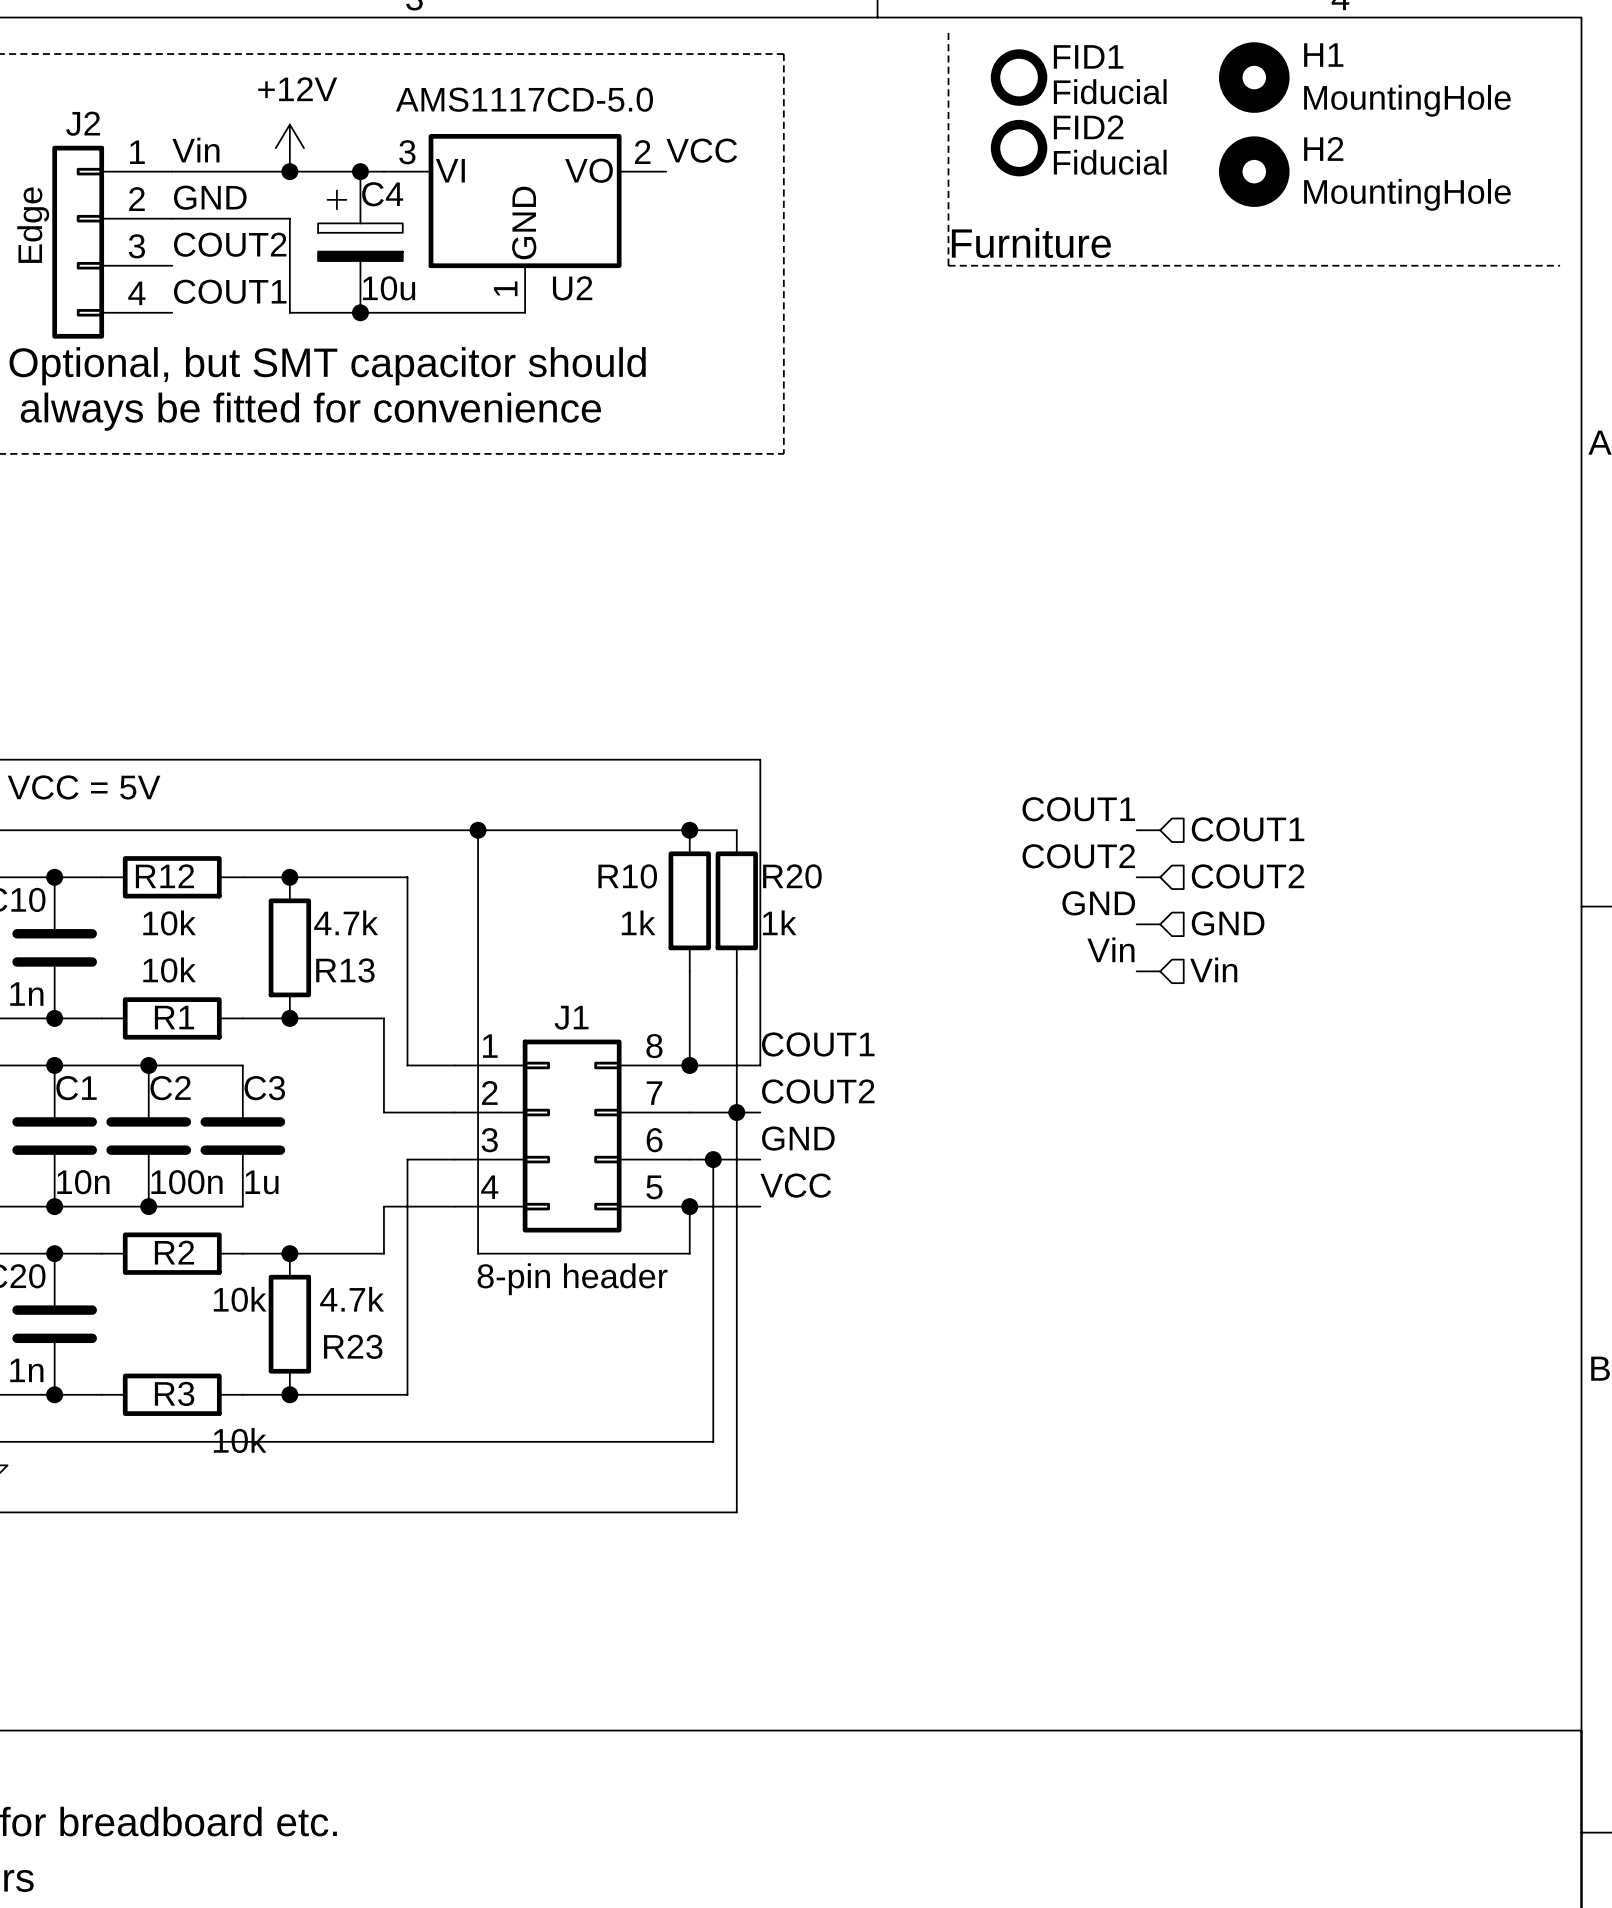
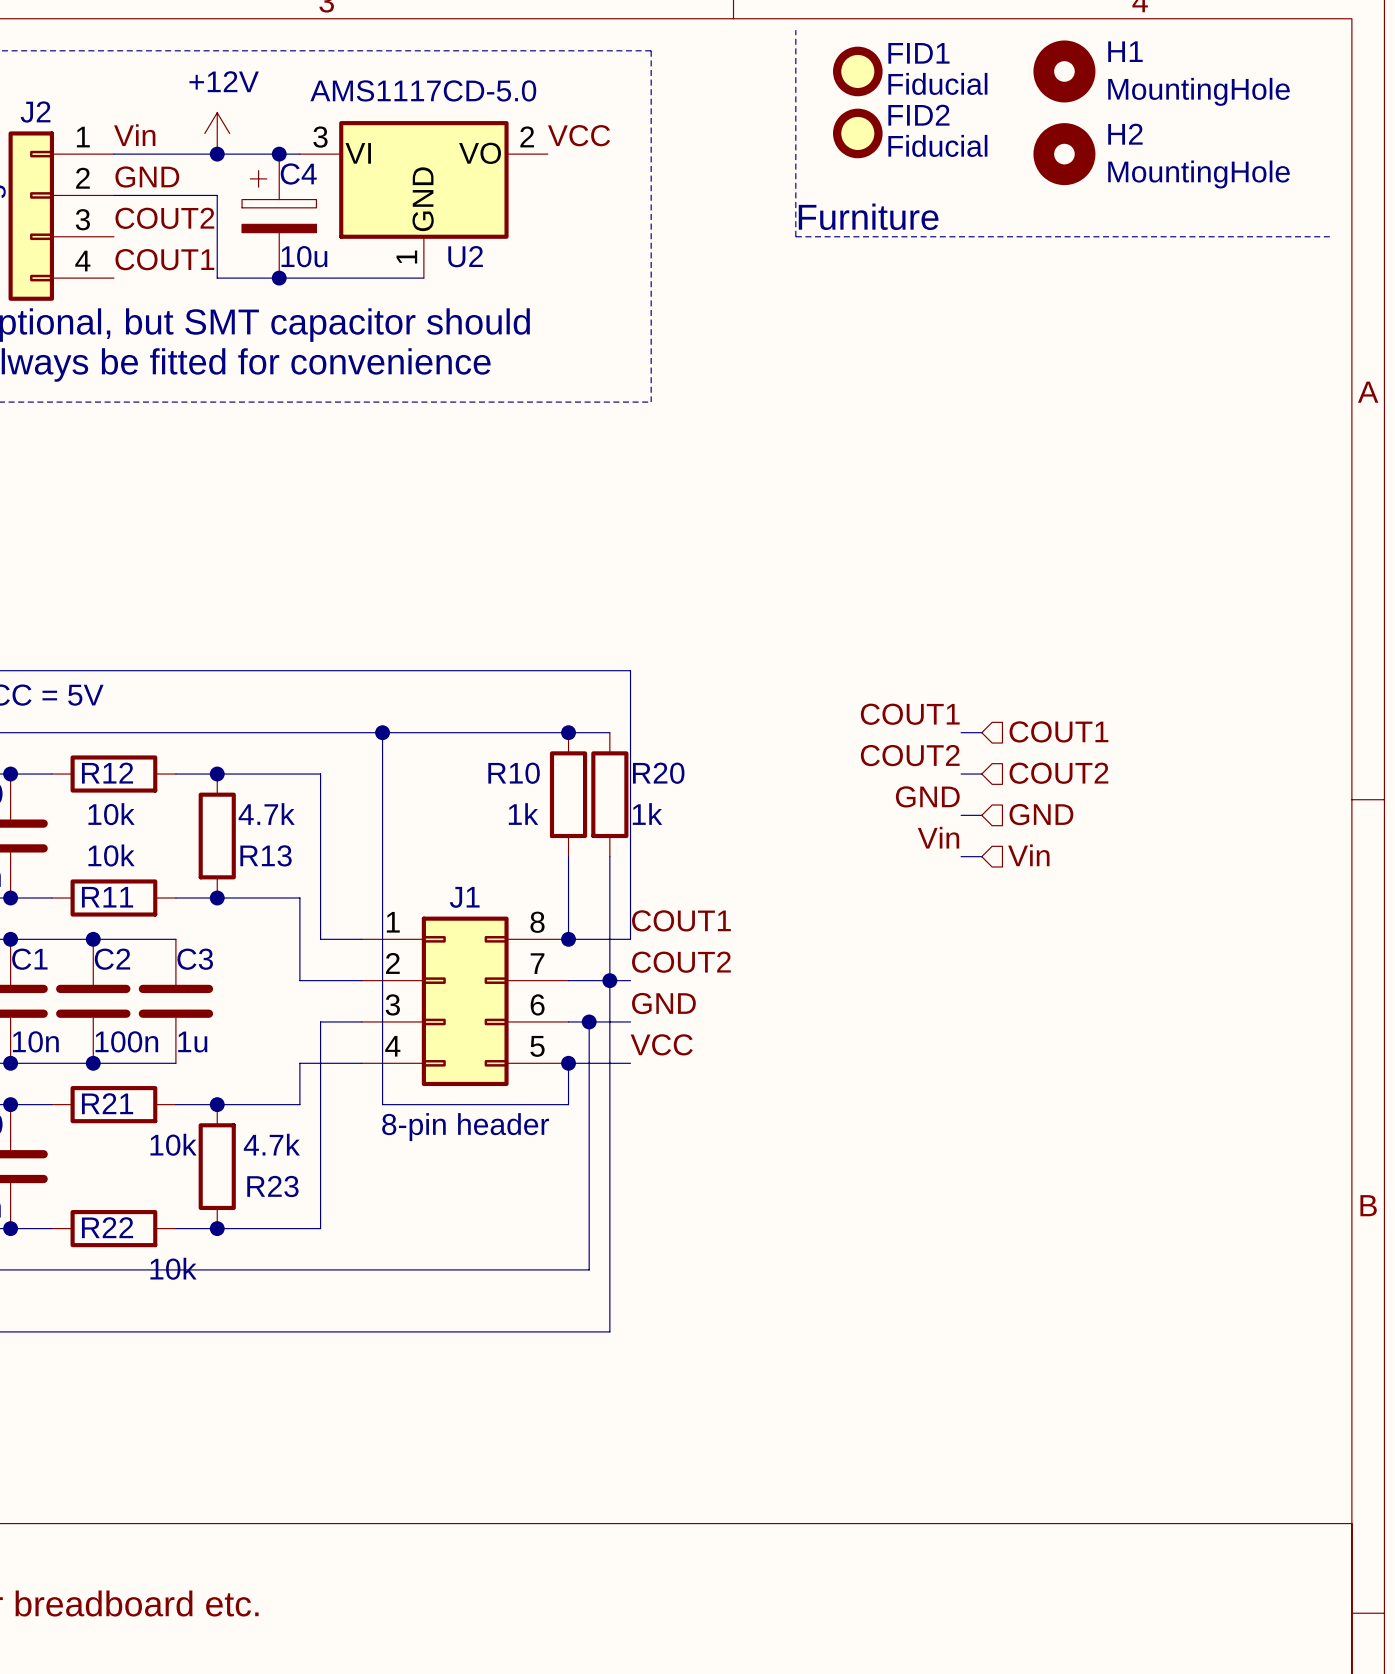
R1 name: R1 (174, 1017) -> R11 (107, 897)
R2 name: R2 (174, 1252) -> R21 (107, 1103)
R3 name: R3 (174, 1393) -> R22 (107, 1227)

